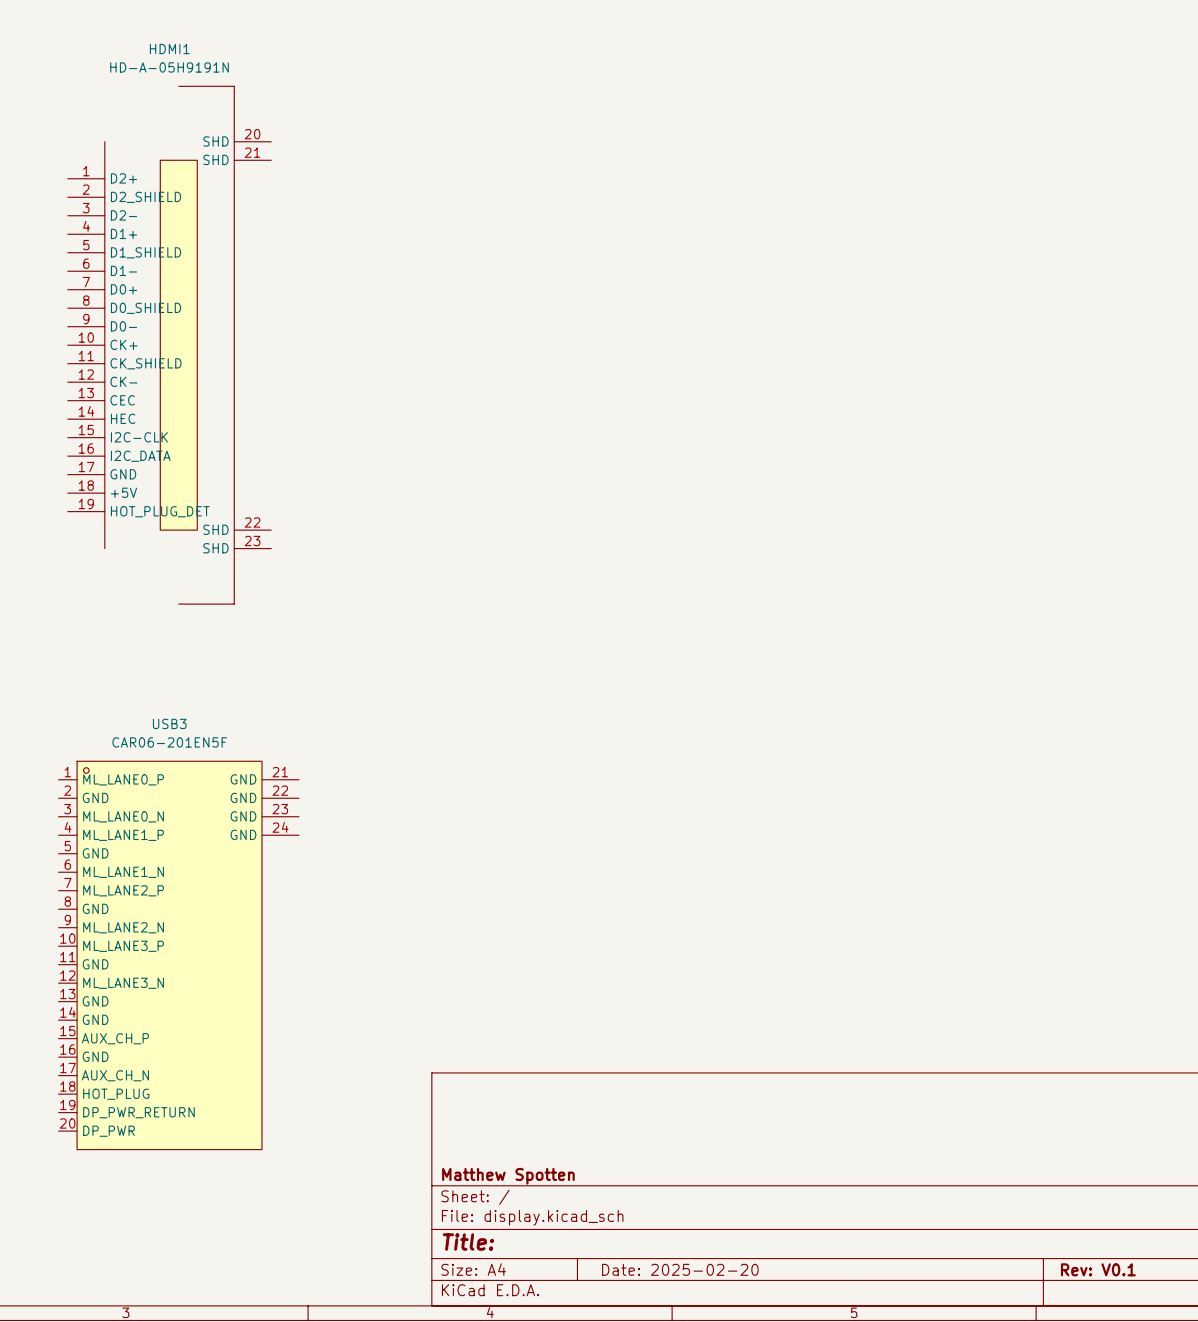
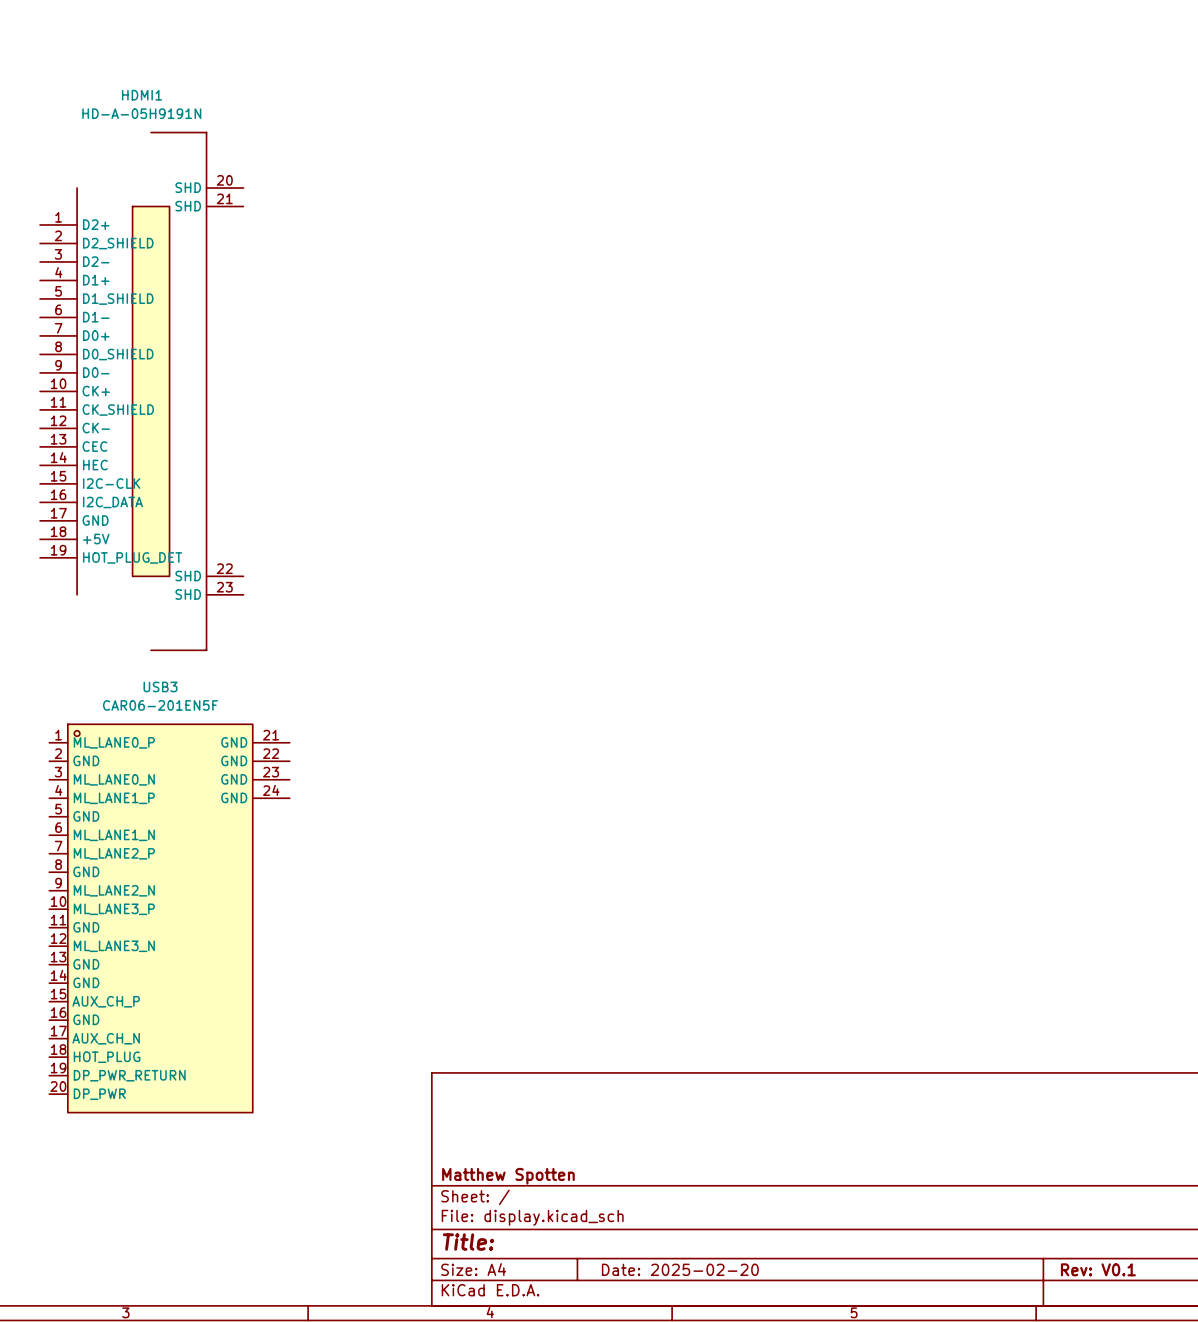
HDMI1 position: (169, 345) -> (141, 391)
USB3 position: (178, 955) -> (169, 918)

